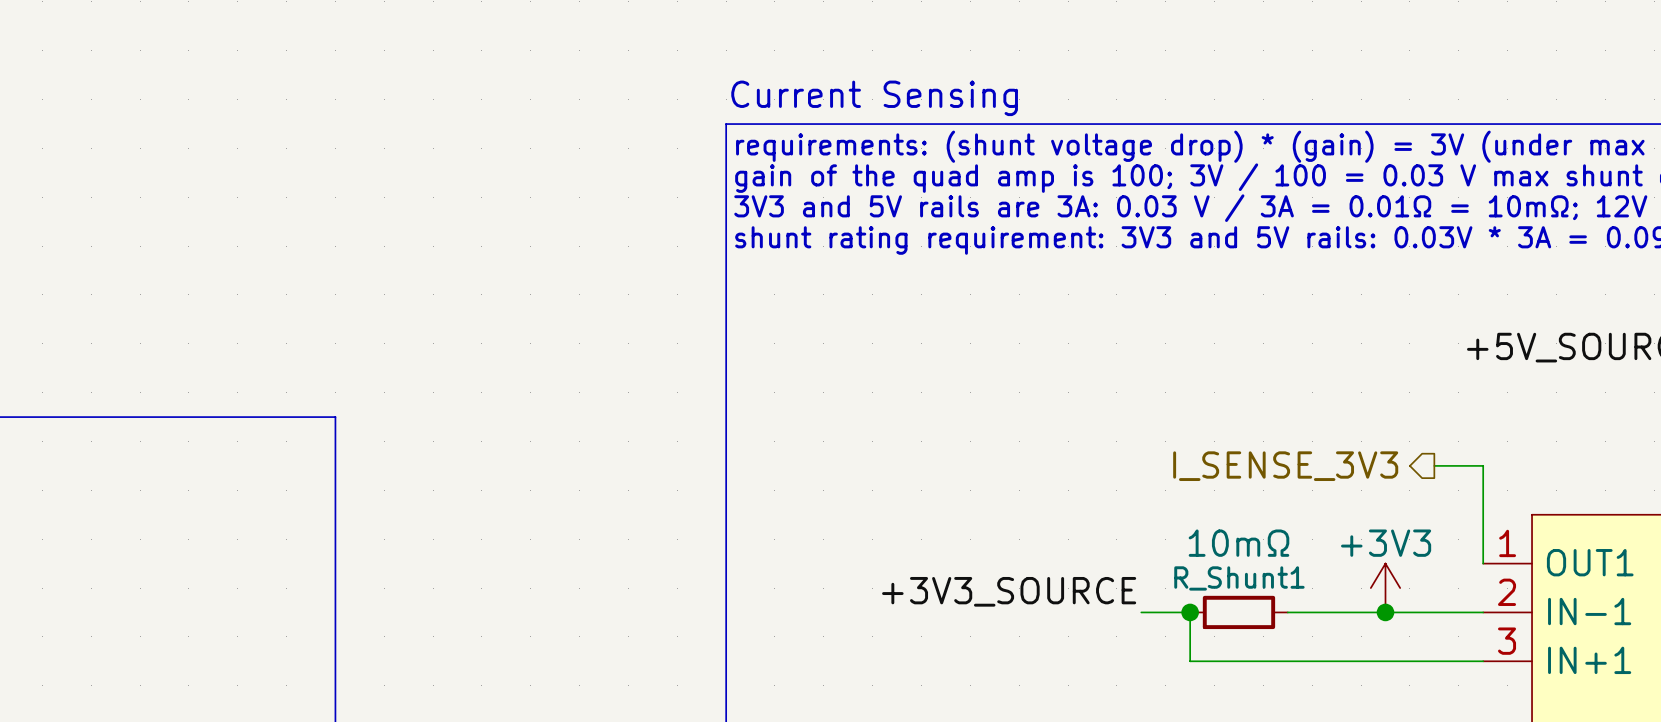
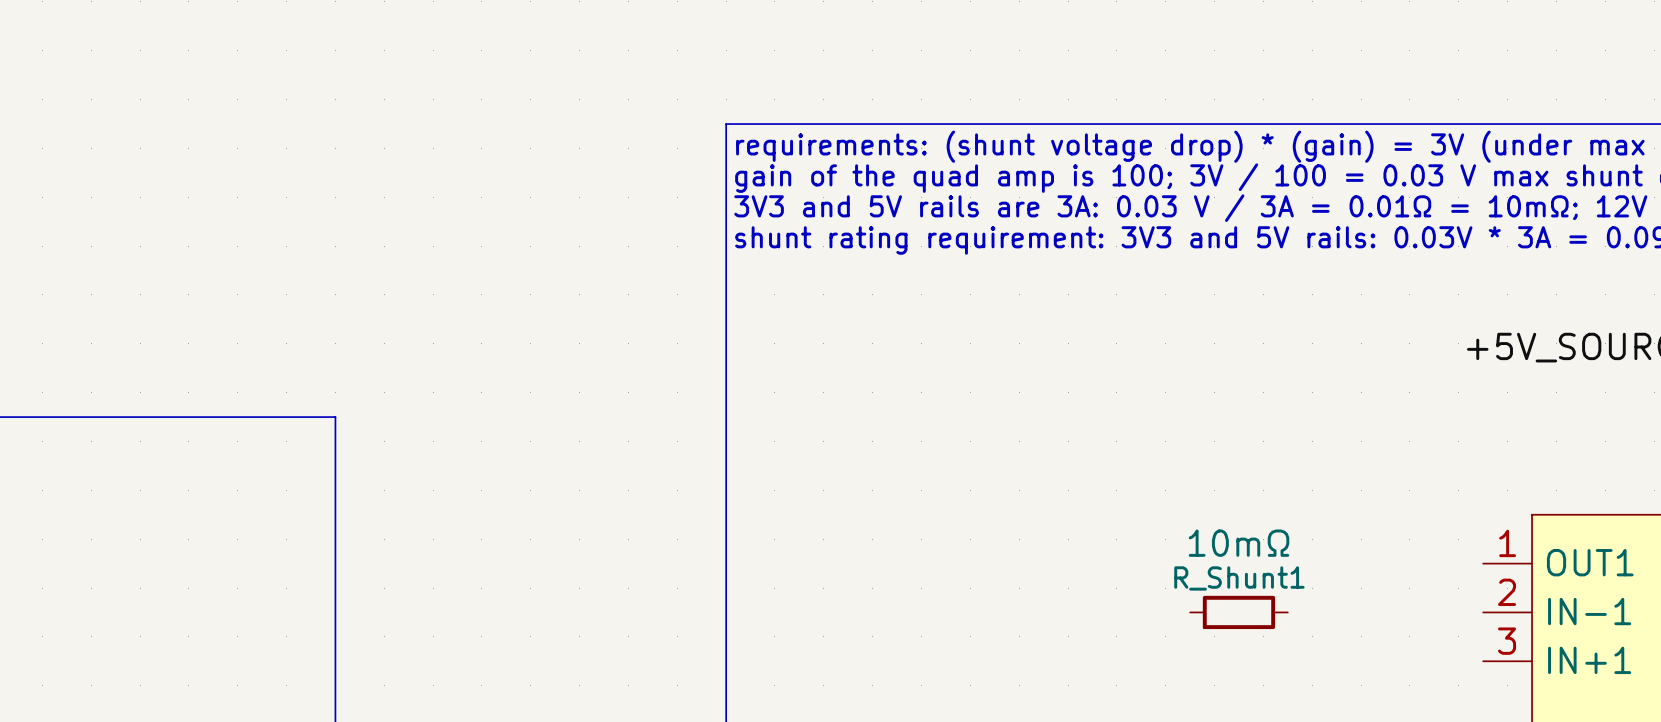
text: Current Sensing (874, 98) -> none
wire: (1434, 465) (1483, 465) (1483, 563) -> none
hierarchical label: I_SENSE_3V3 (1285, 466) -> none
power symbol: +3V3 (1385, 588) -> none
label: +3V3_SOURCE (1009, 591) -> none
wire: (1141, 612) (1190, 612) (1190, 661) (1483, 661) -> none
junction: (1190, 612) -> none
wire: (1287, 612) (1483, 612) -> none
junction: (1385, 612) -> none

